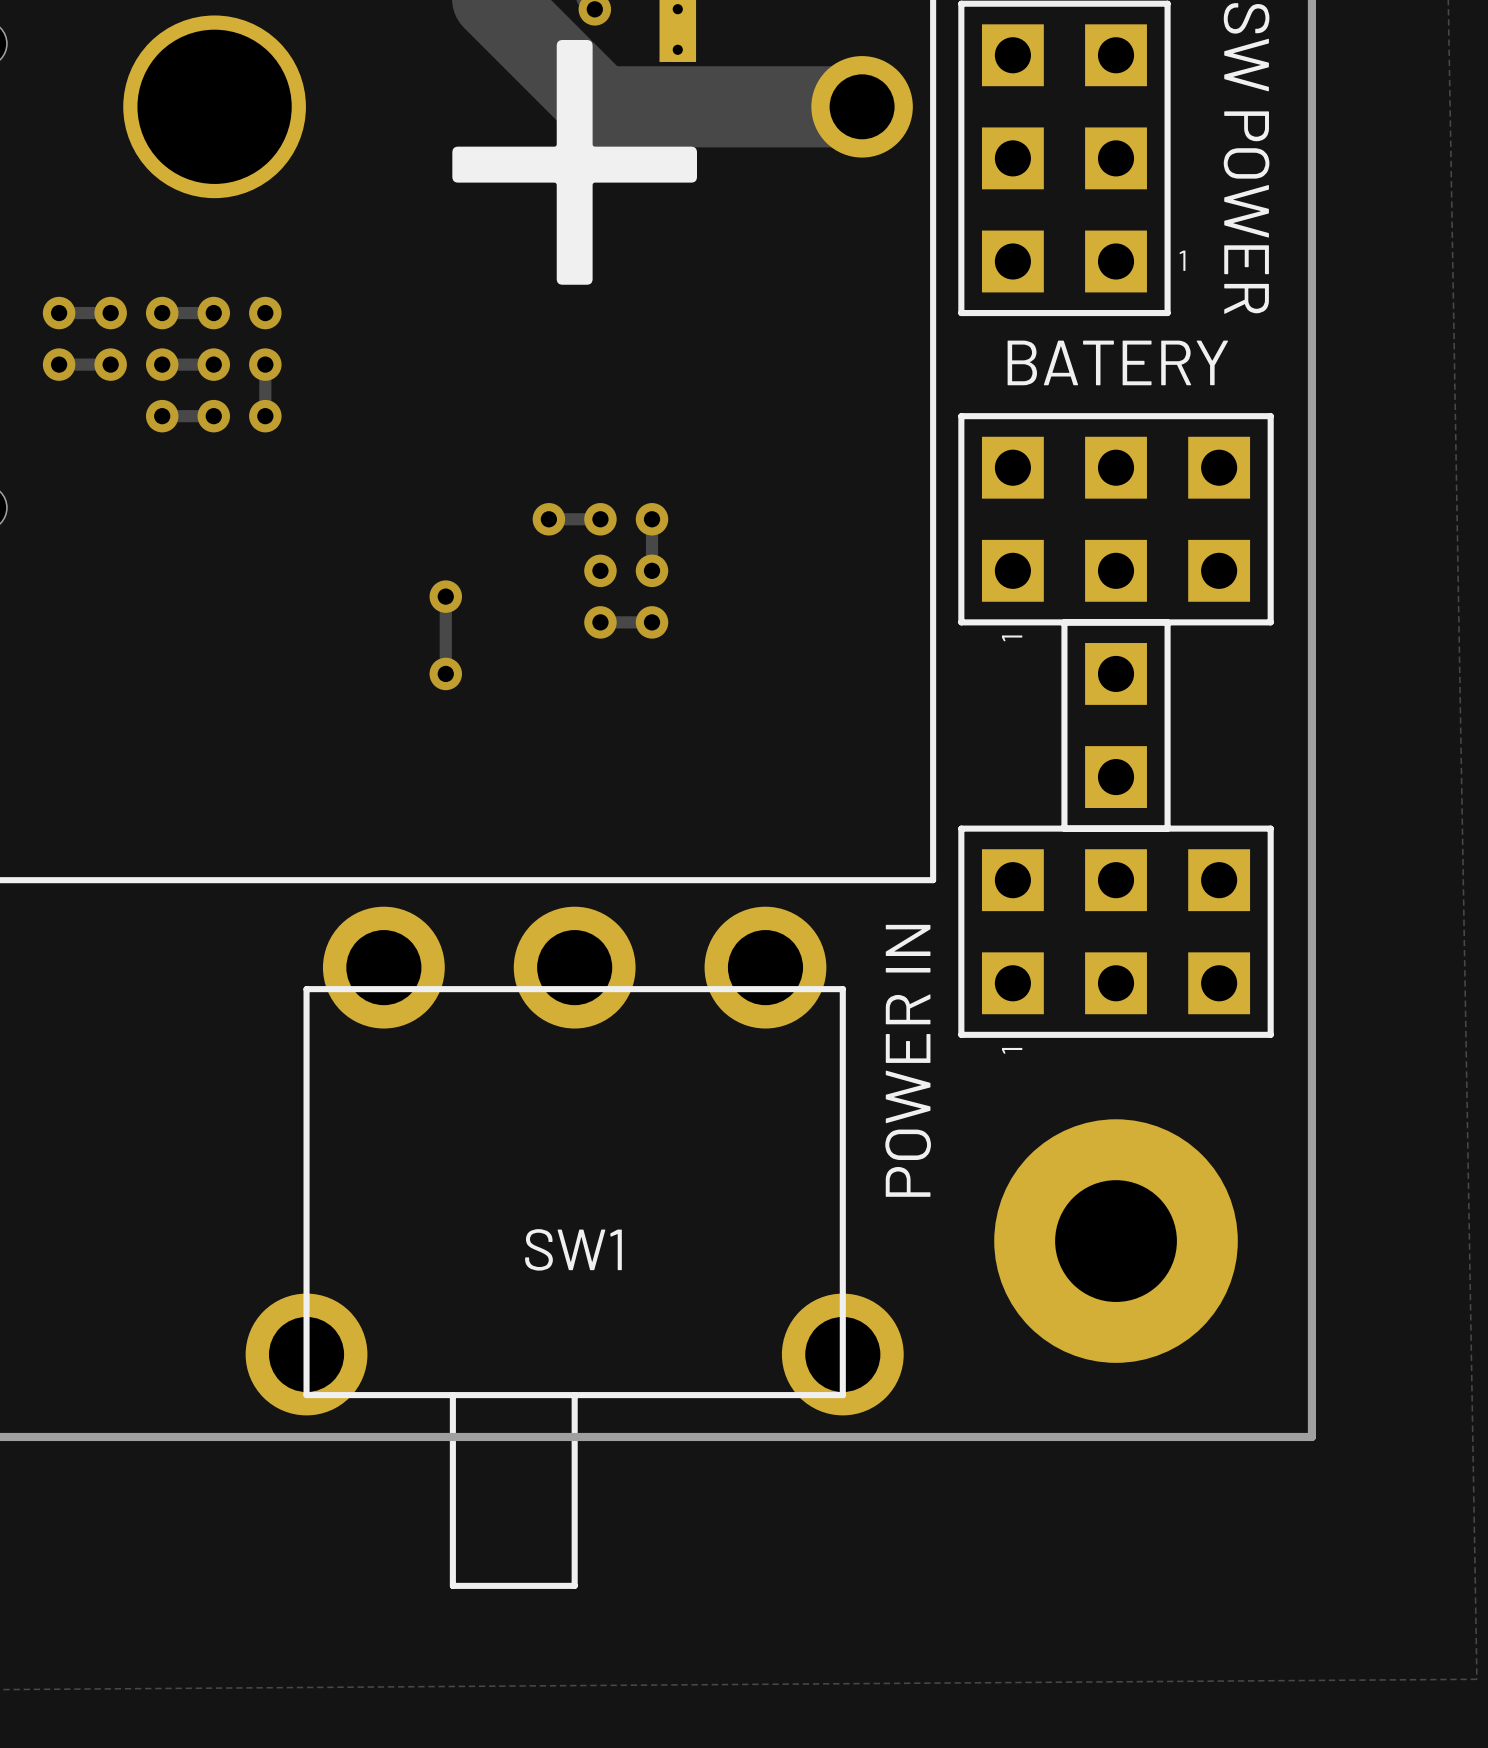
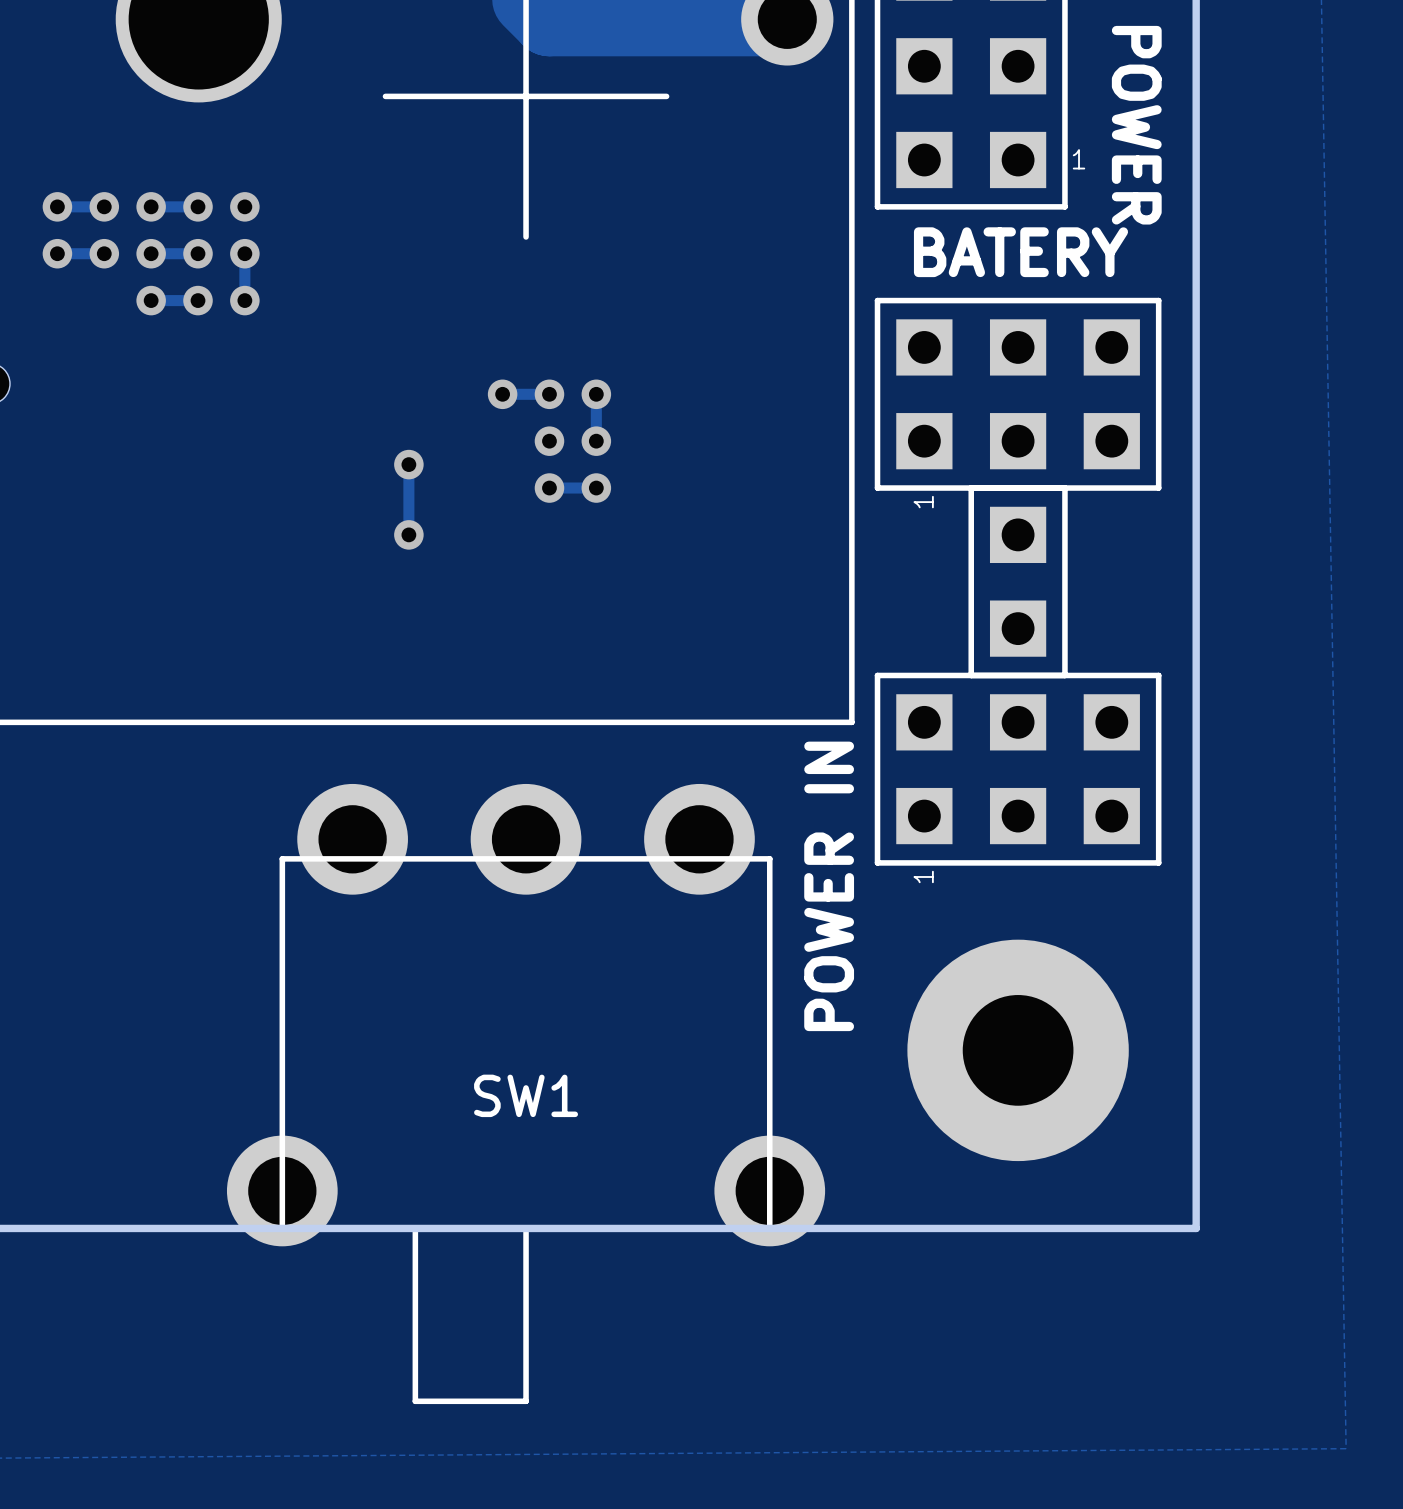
SW1 position: (574, 1247) -> (526, 1094)

